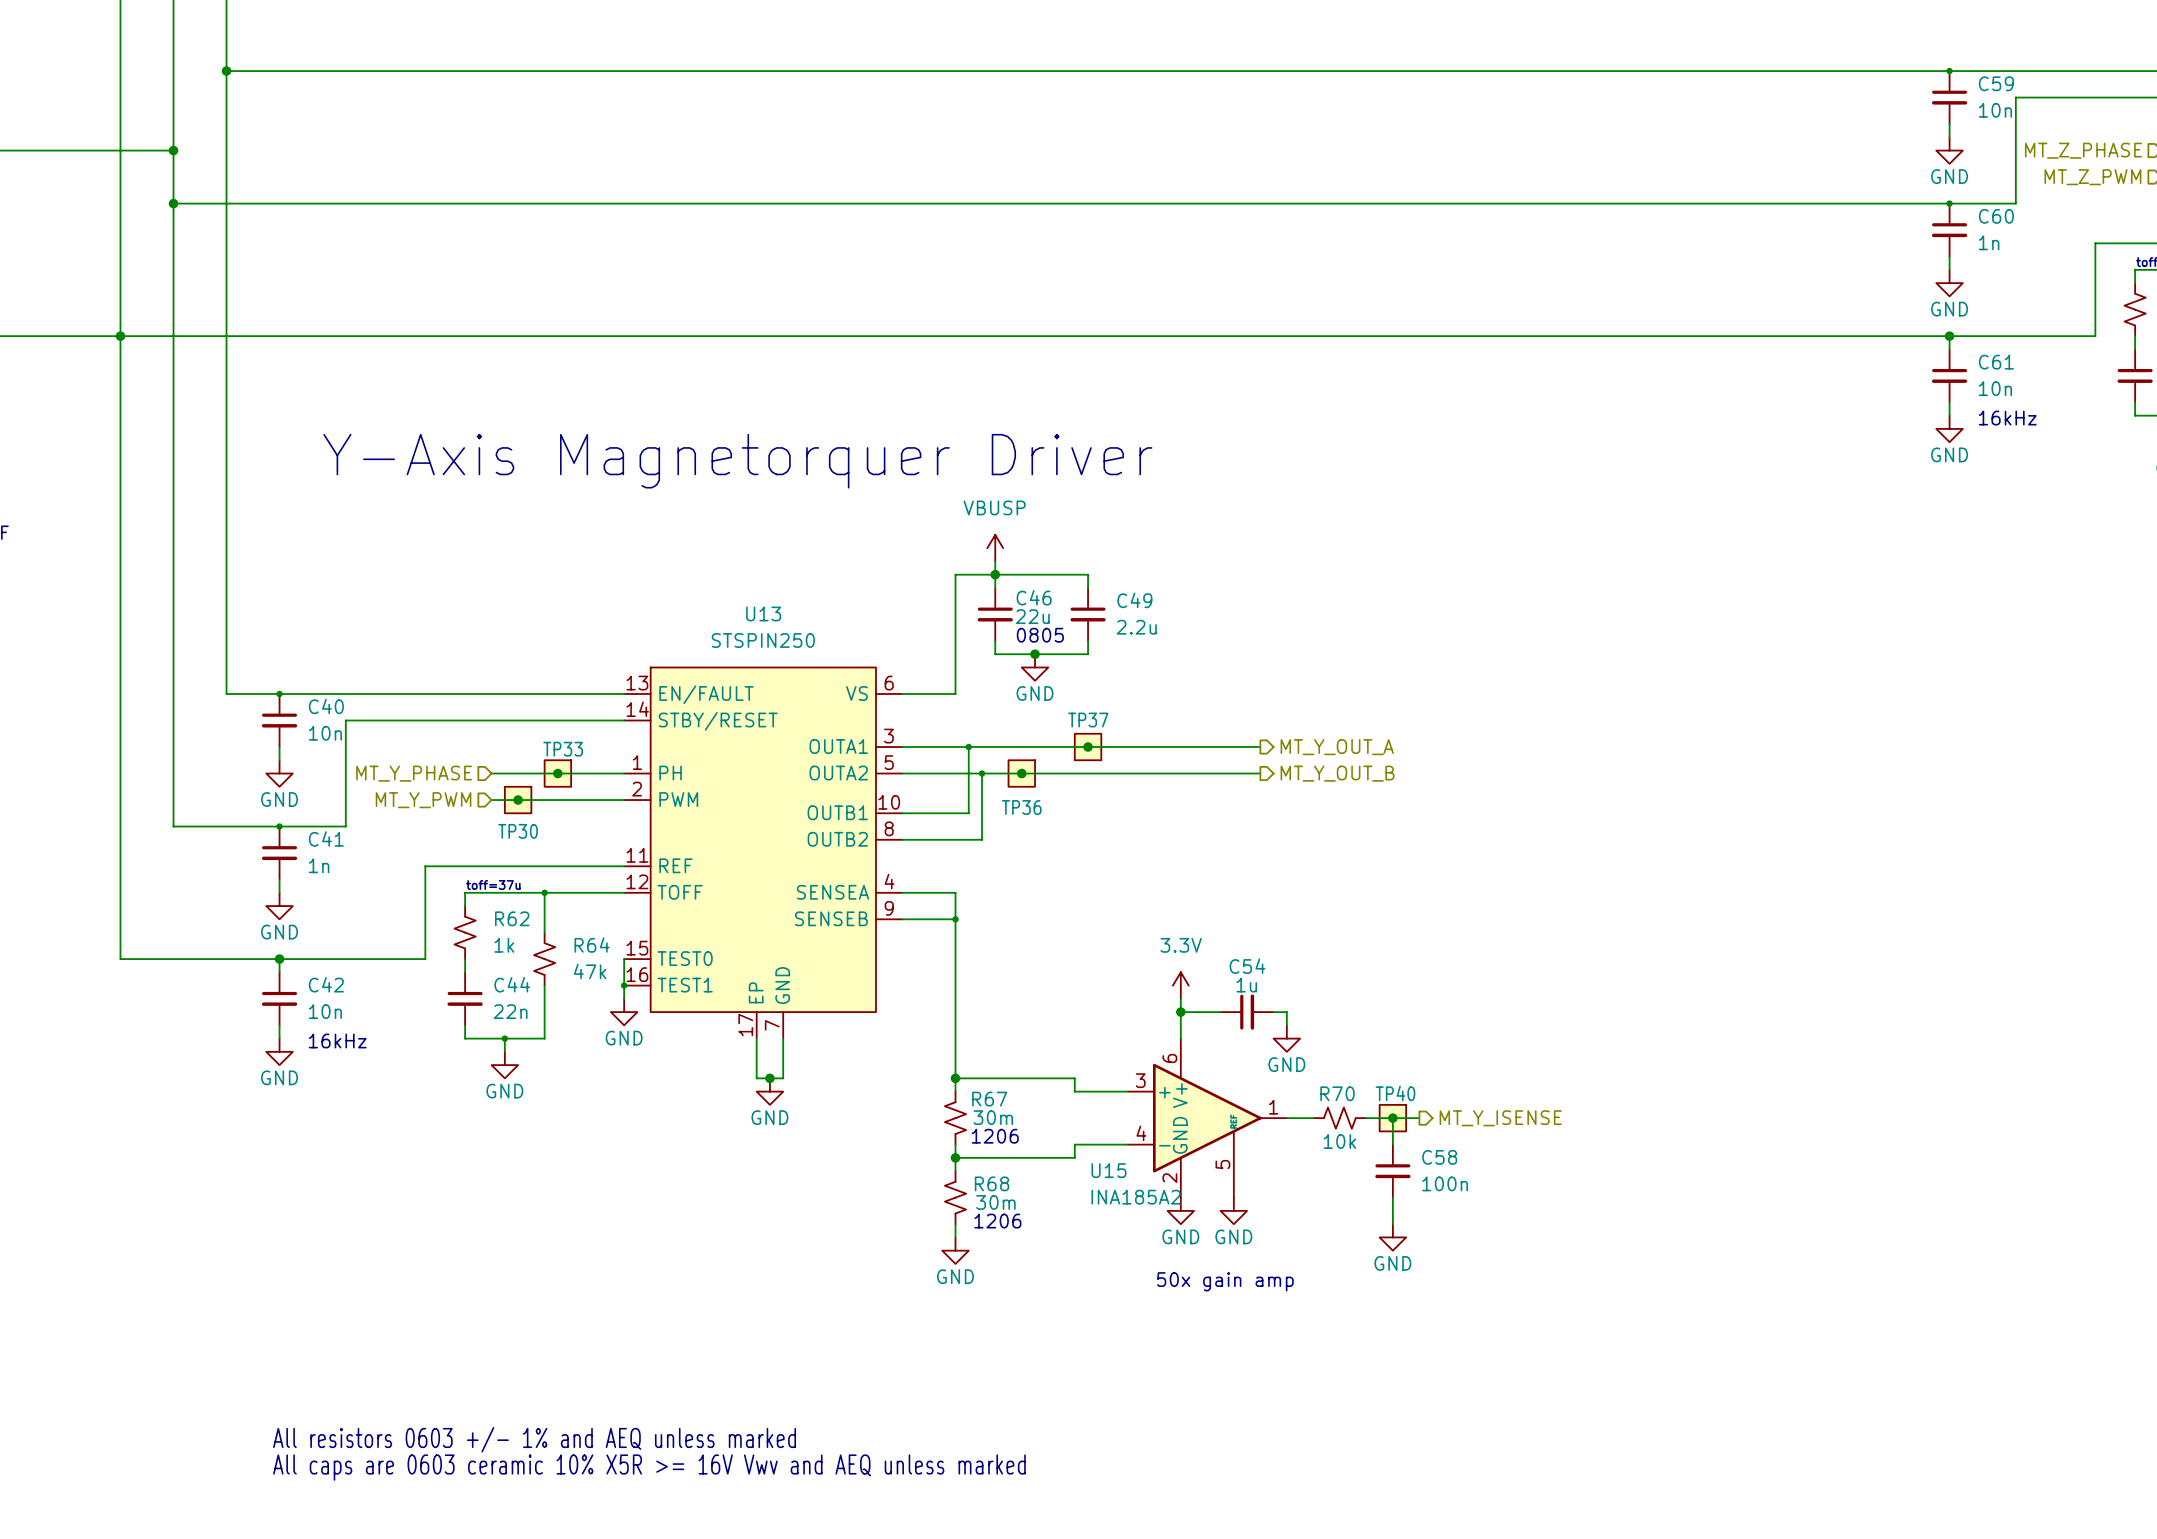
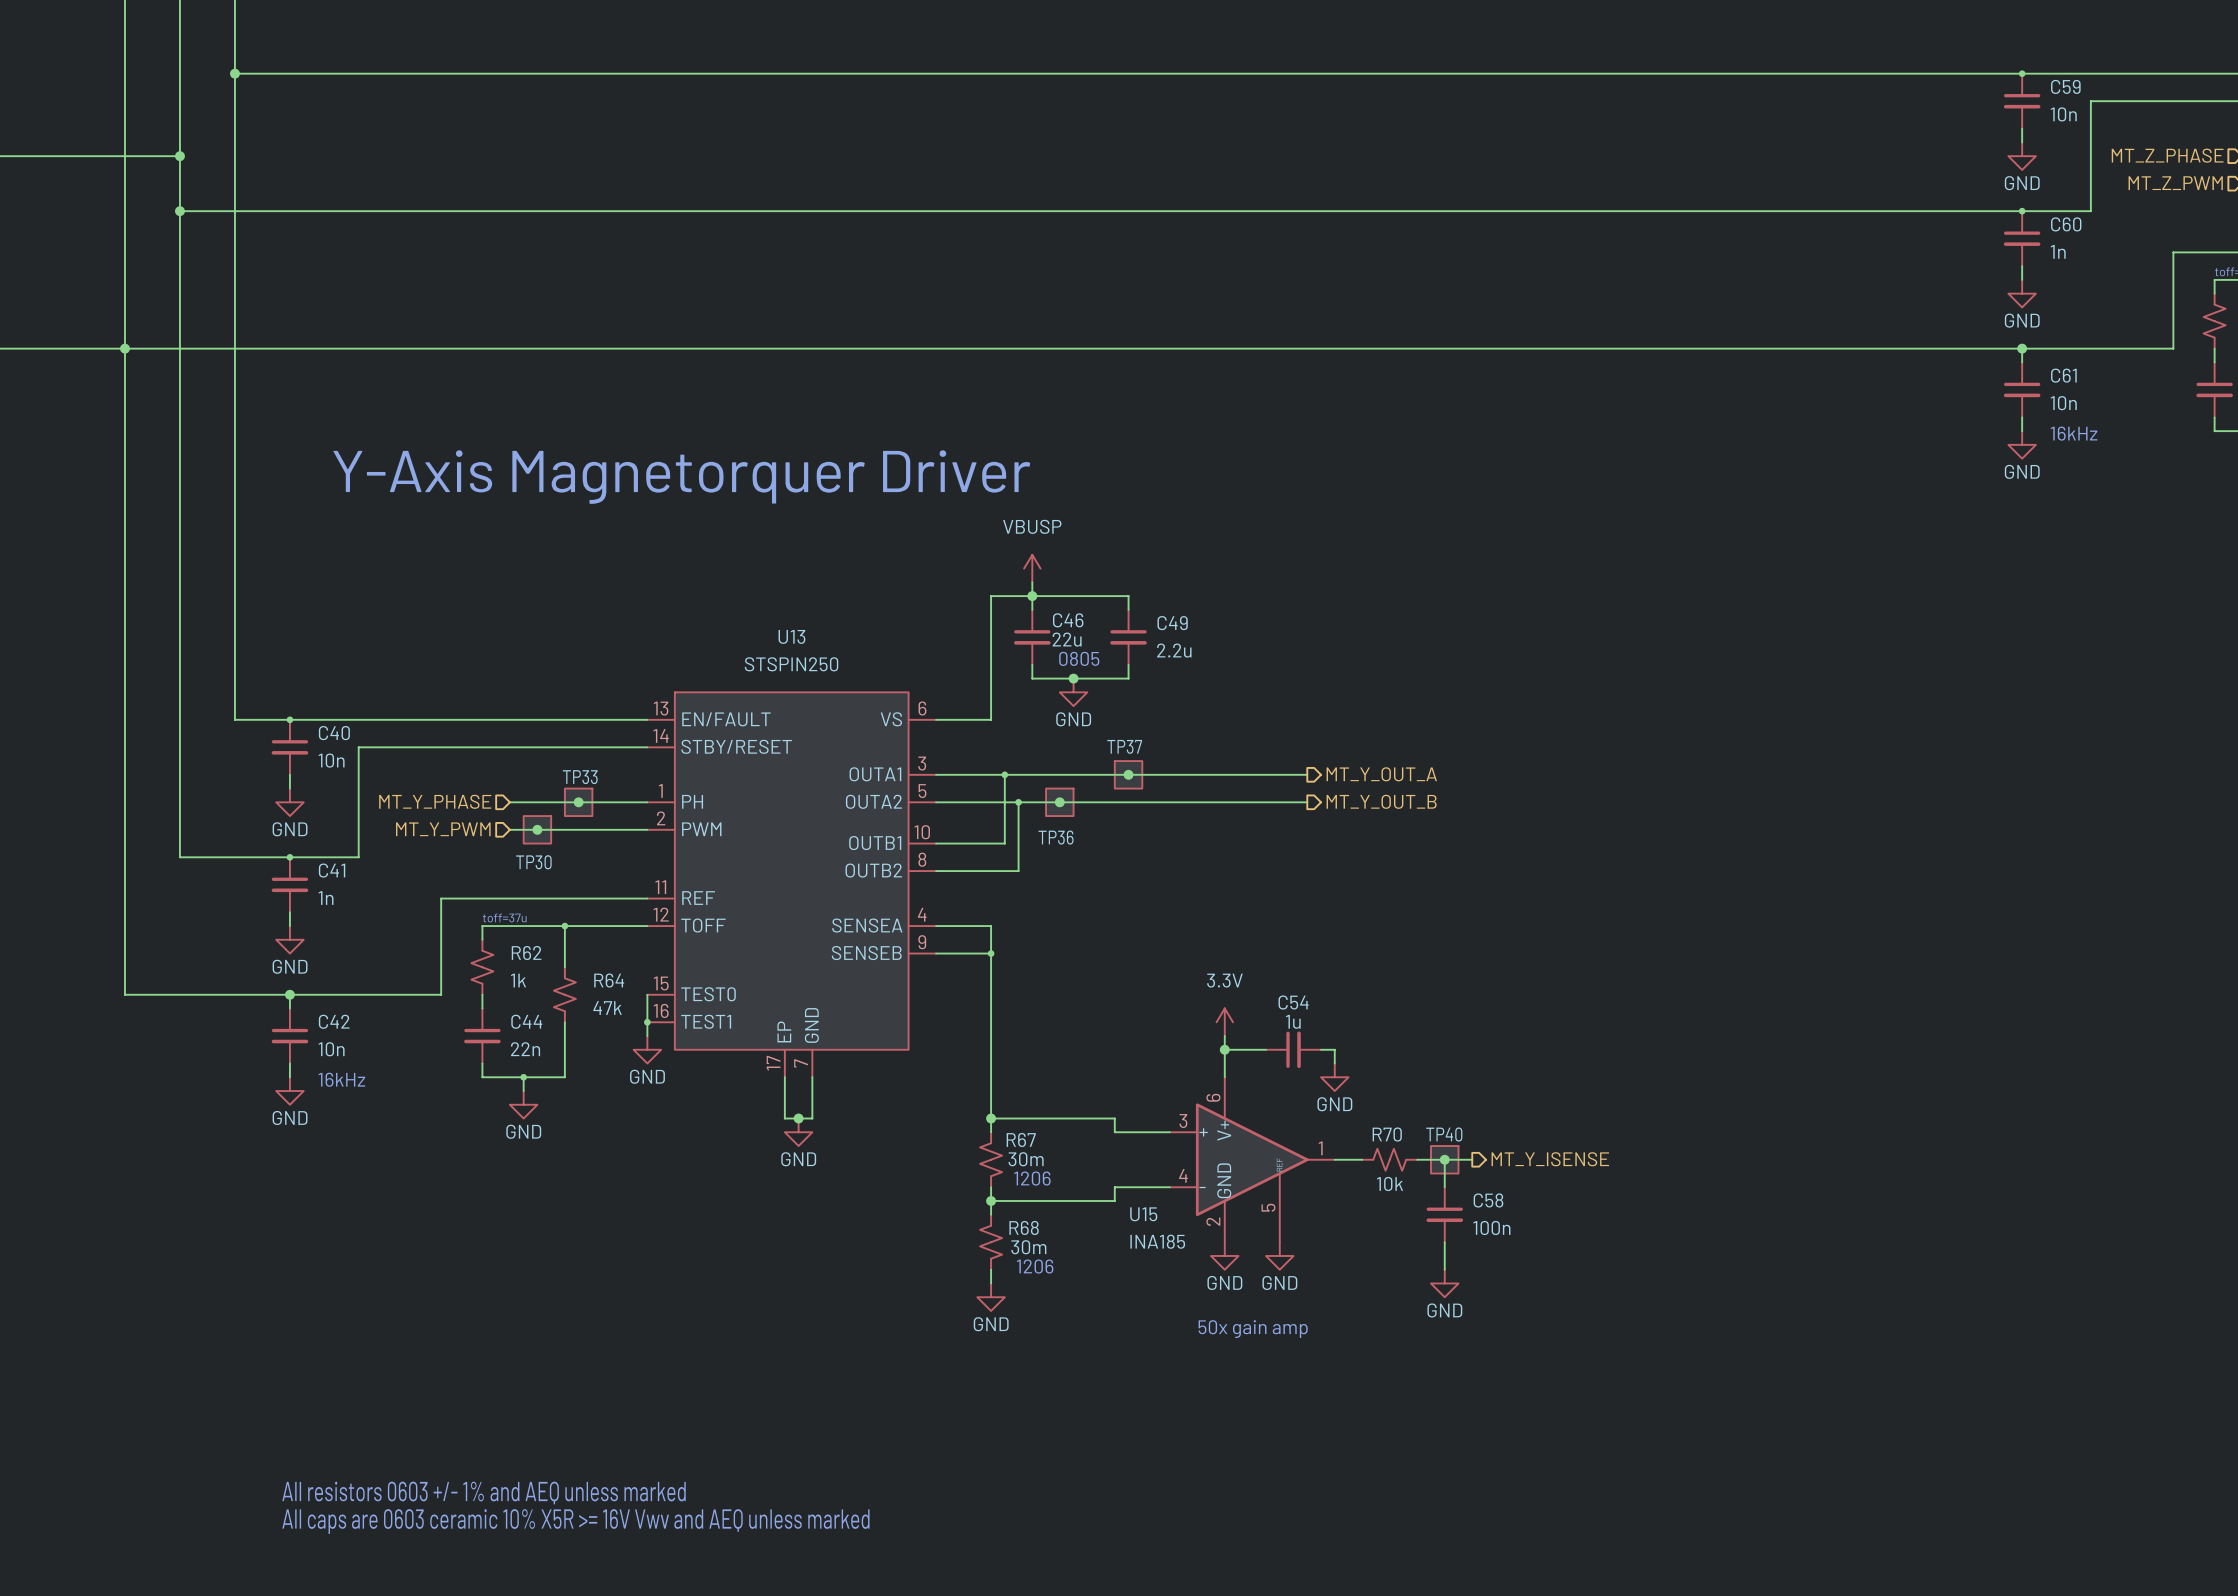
U15 value: INA185A2 (1136, 1197) -> INA185 (1157, 1241)

